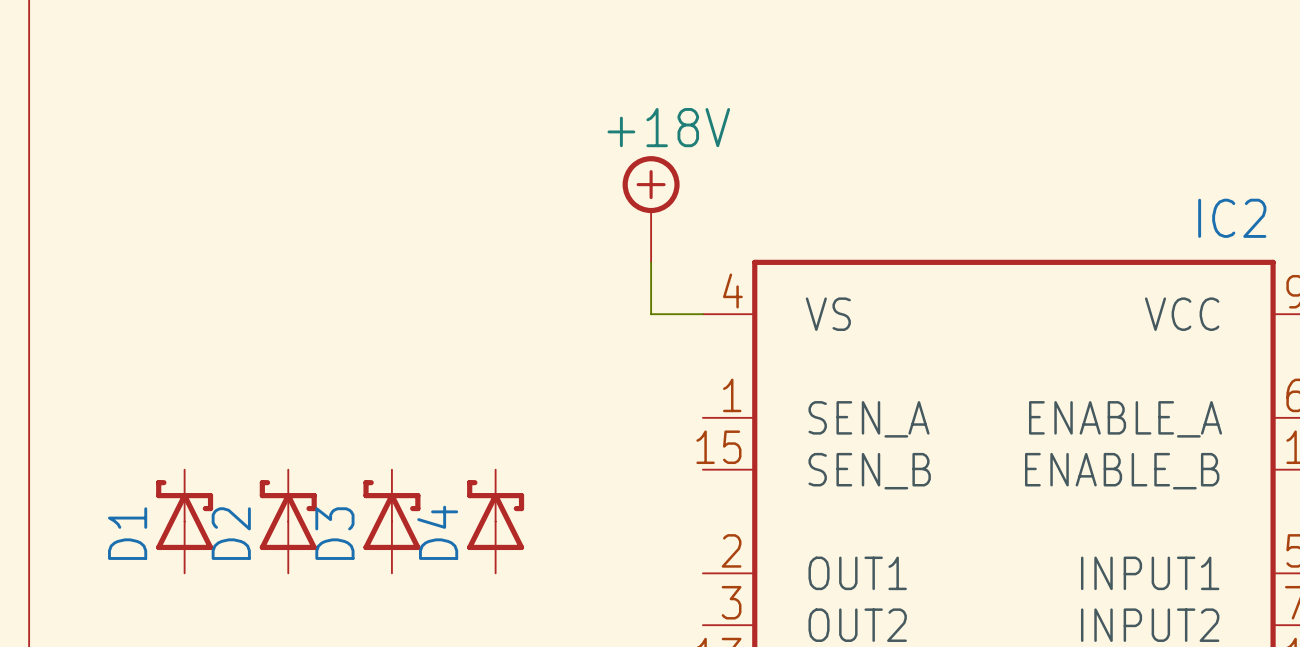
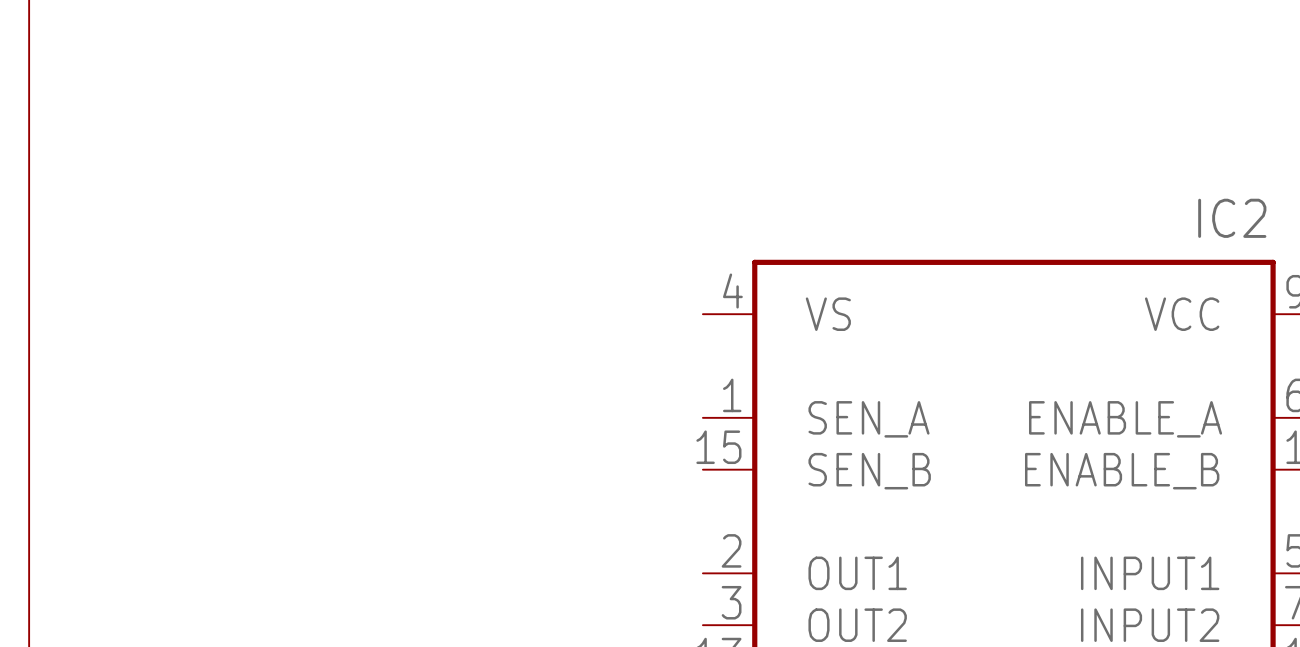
power symbol: +18V (651, 209) -> none
wire: (651, 262) (651, 314) (702, 314) -> none
D1: (184, 521) -> none
D2: (288, 521) -> none
D3: (391, 521) -> none
D4: (495, 521) -> none

